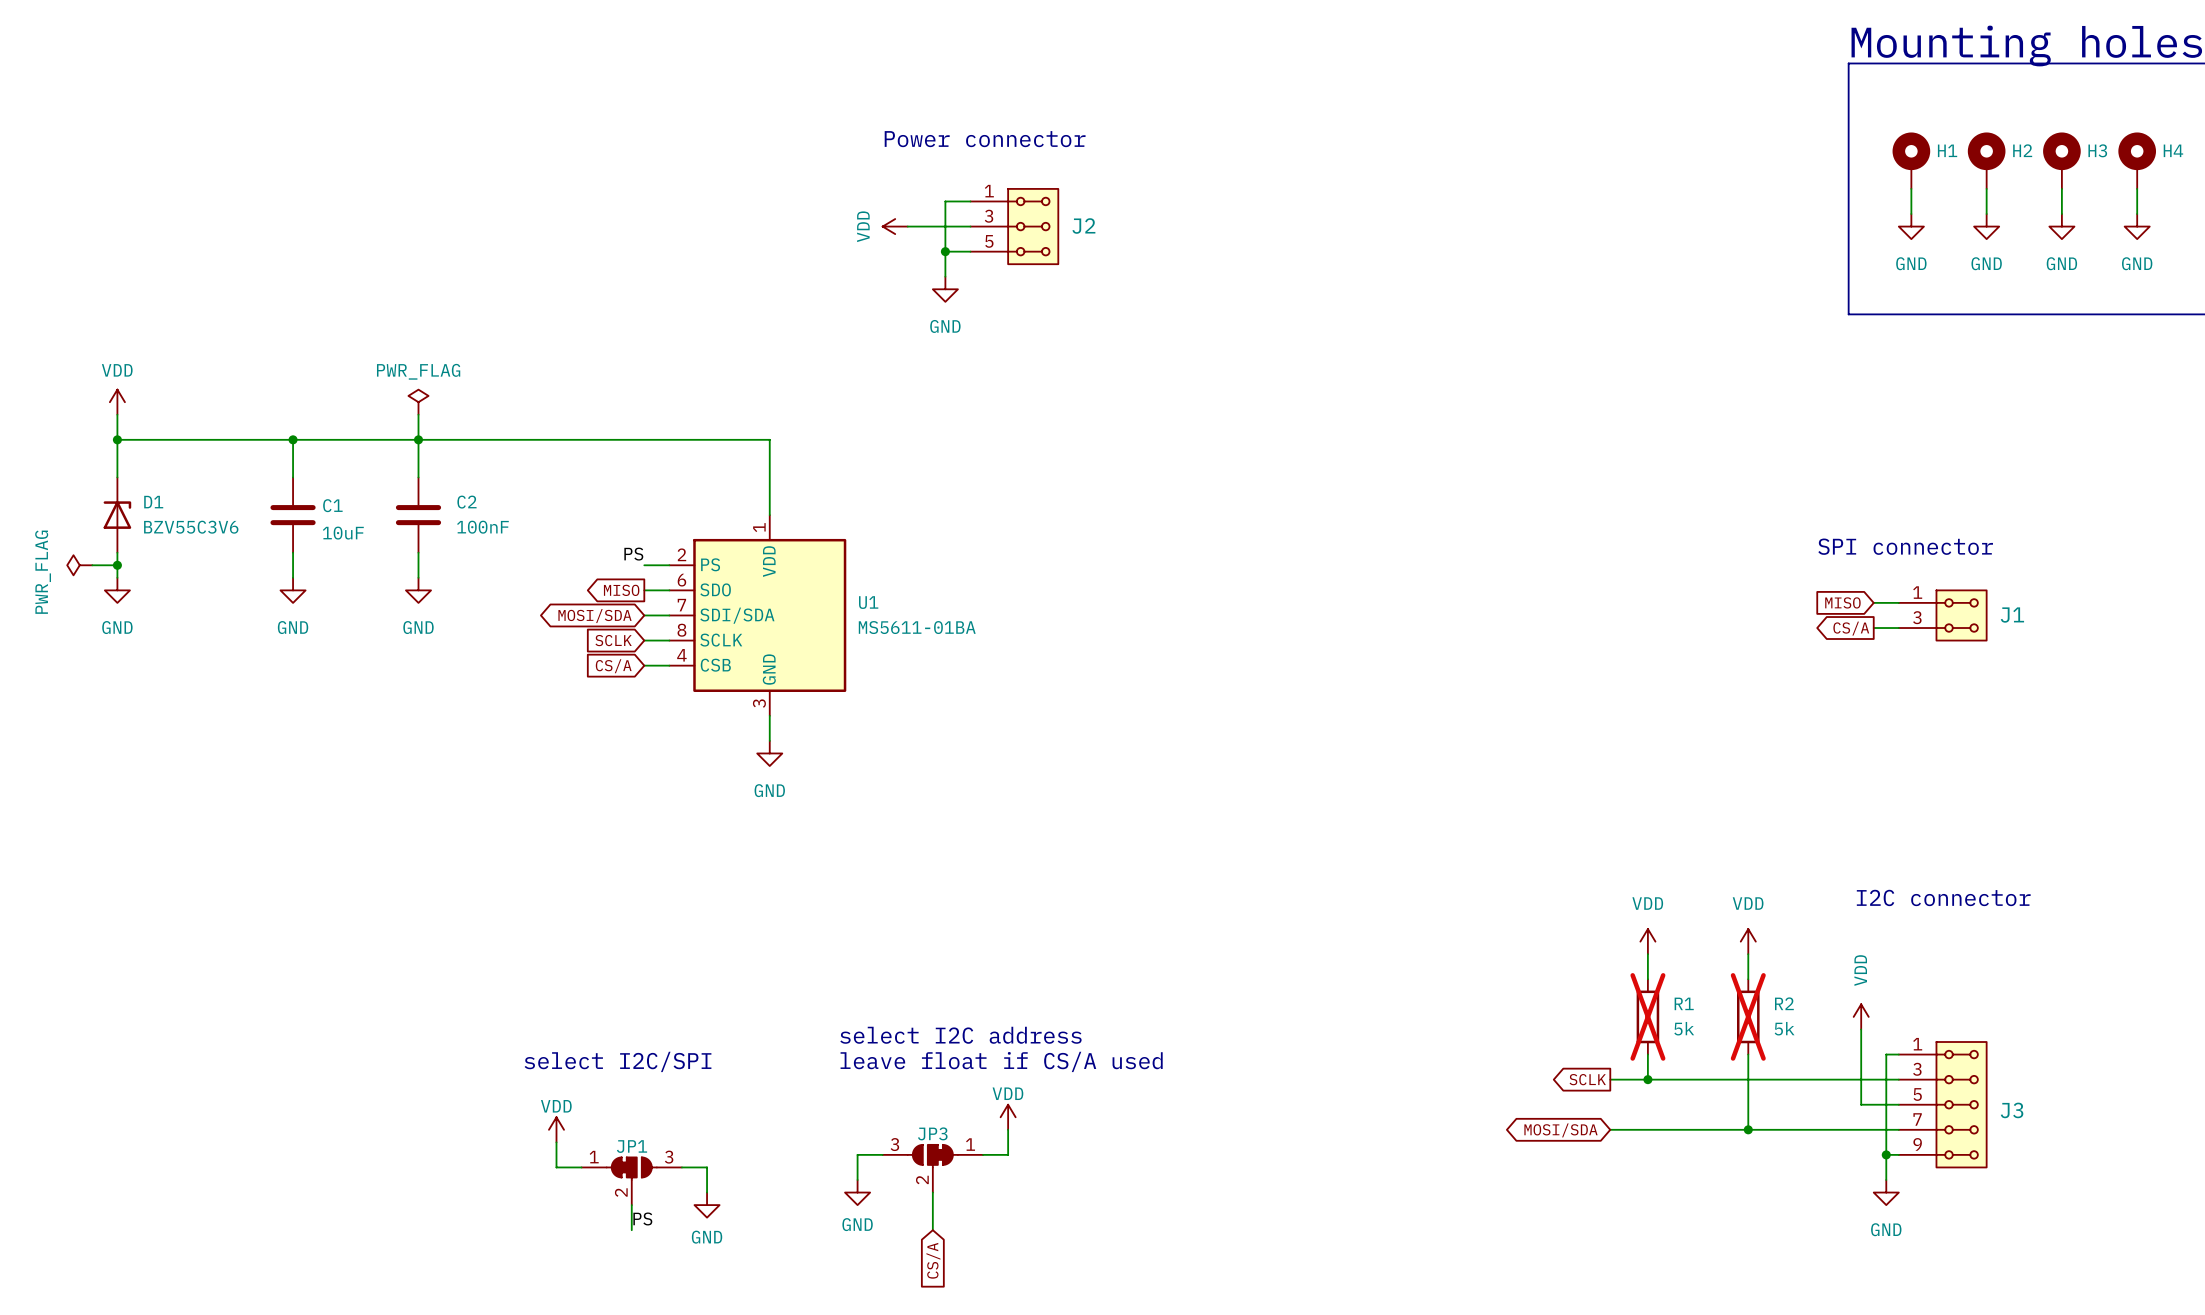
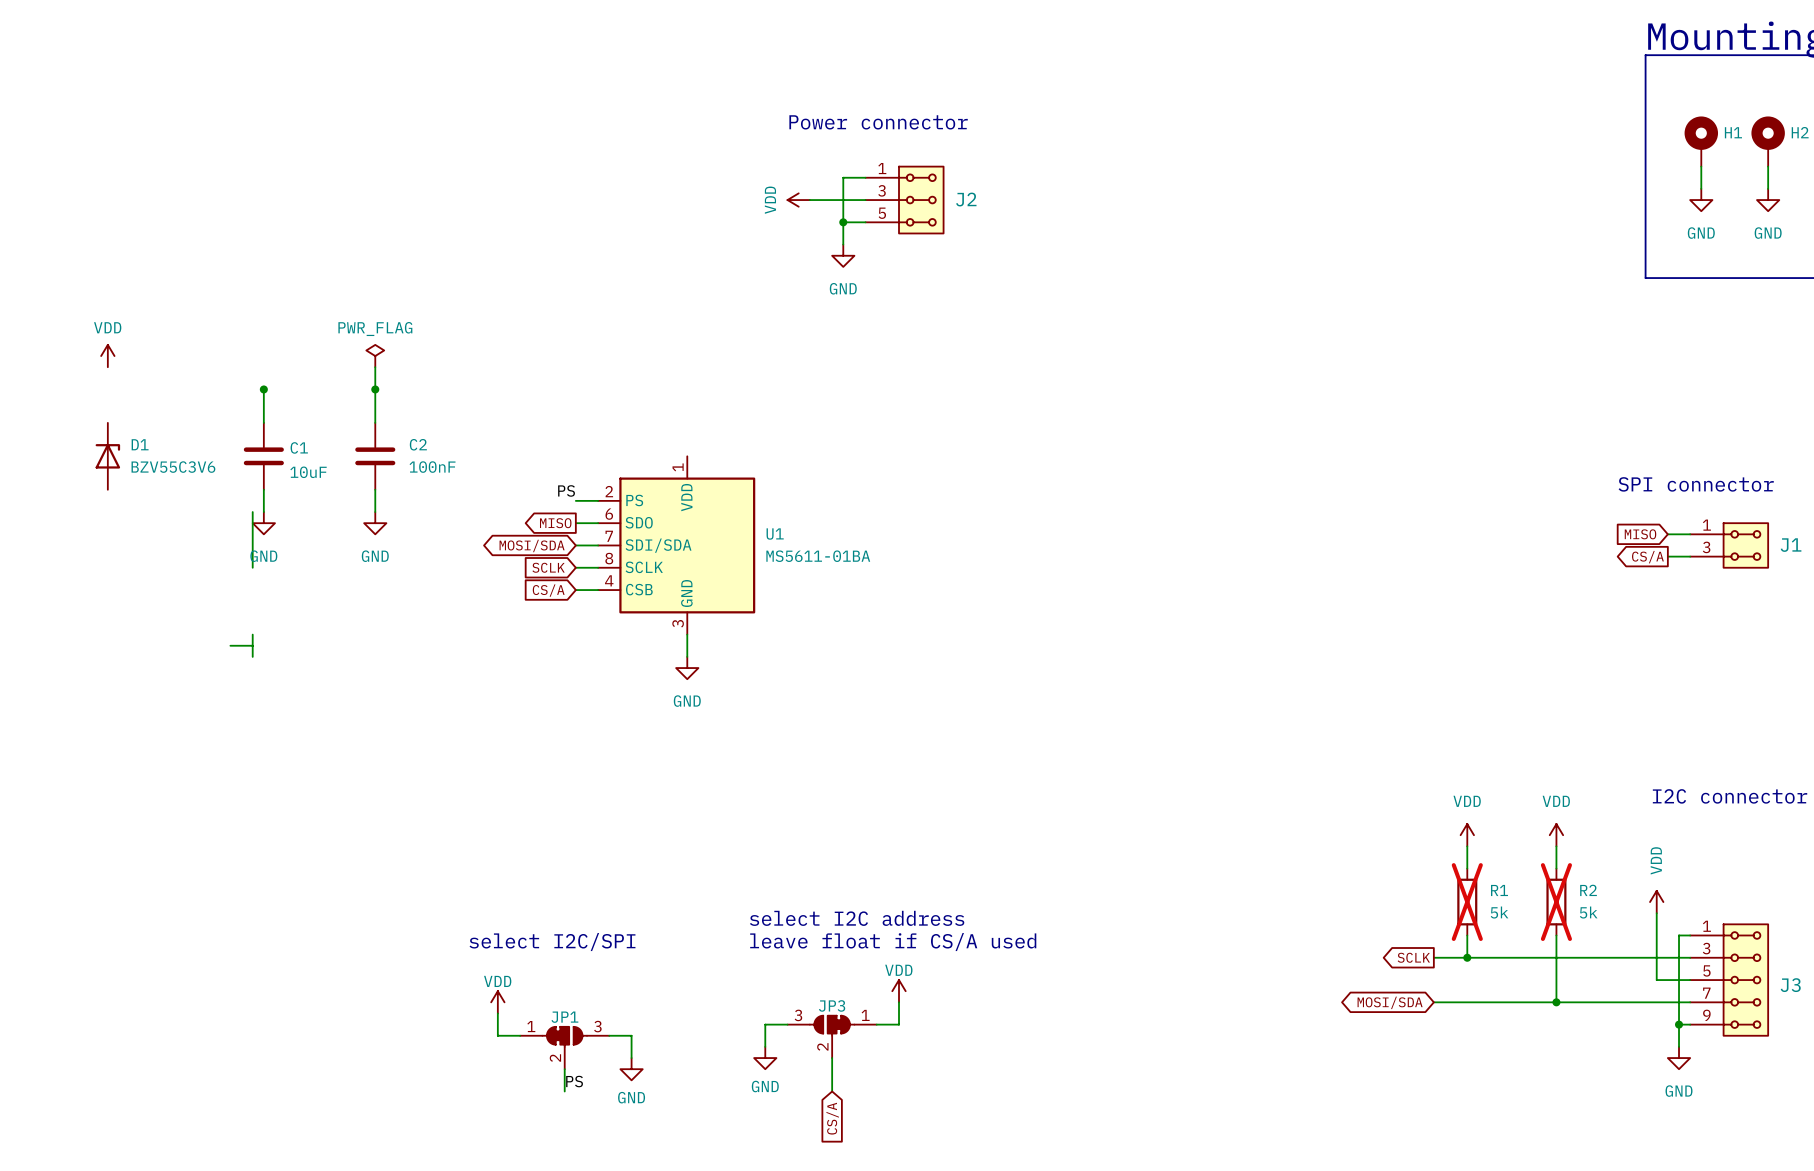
wire: (117, 414) (117, 477) -> (252, 512) (252, 567)
wire: (117, 439) (769, 439) (769, 515) -> none
junction: (117, 439) -> none
wire: (117, 552) (117, 577) -> (252, 634) (252, 656)
power symbol: PWR_FLAG (79, 565) -> none
wire: (92, 565) (117, 565) -> (230, 645) (252, 645)
junction: (117, 565) -> none
power symbol: GND (117, 590) -> none

